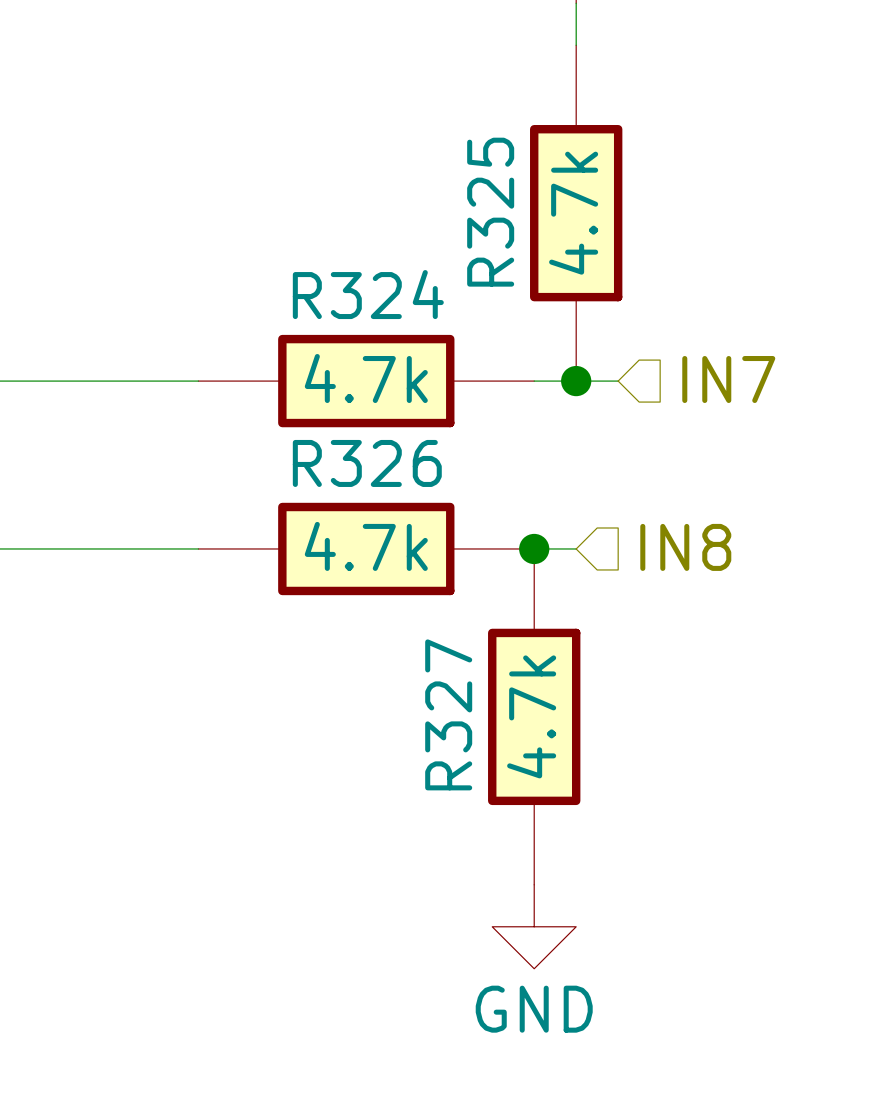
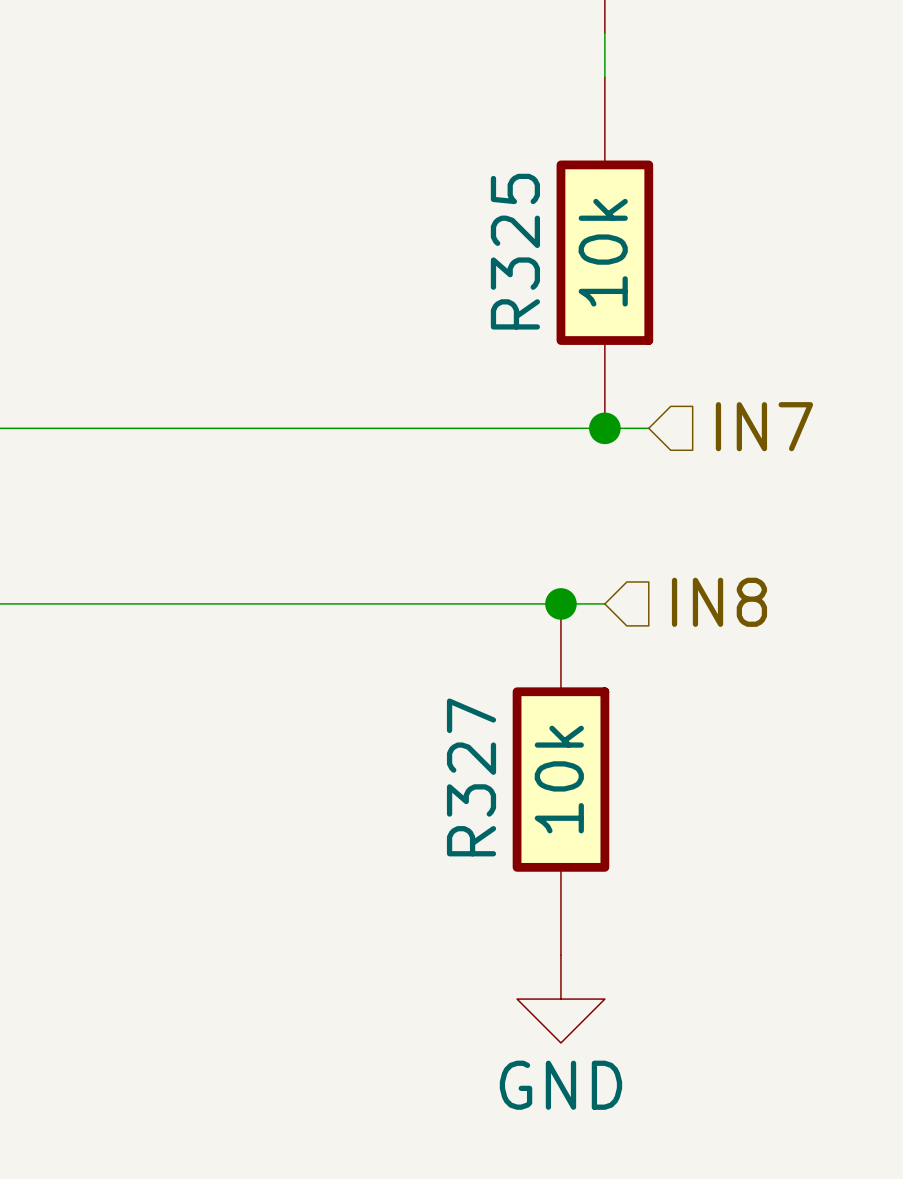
R325 value: 4.7k (573, 213) -> 10k (603, 252)
R324: 4.7k (366, 381) -> none
R326: 4.7k (366, 548) -> none
R327 value: 4.7k (531, 716) -> 10k (559, 779)

